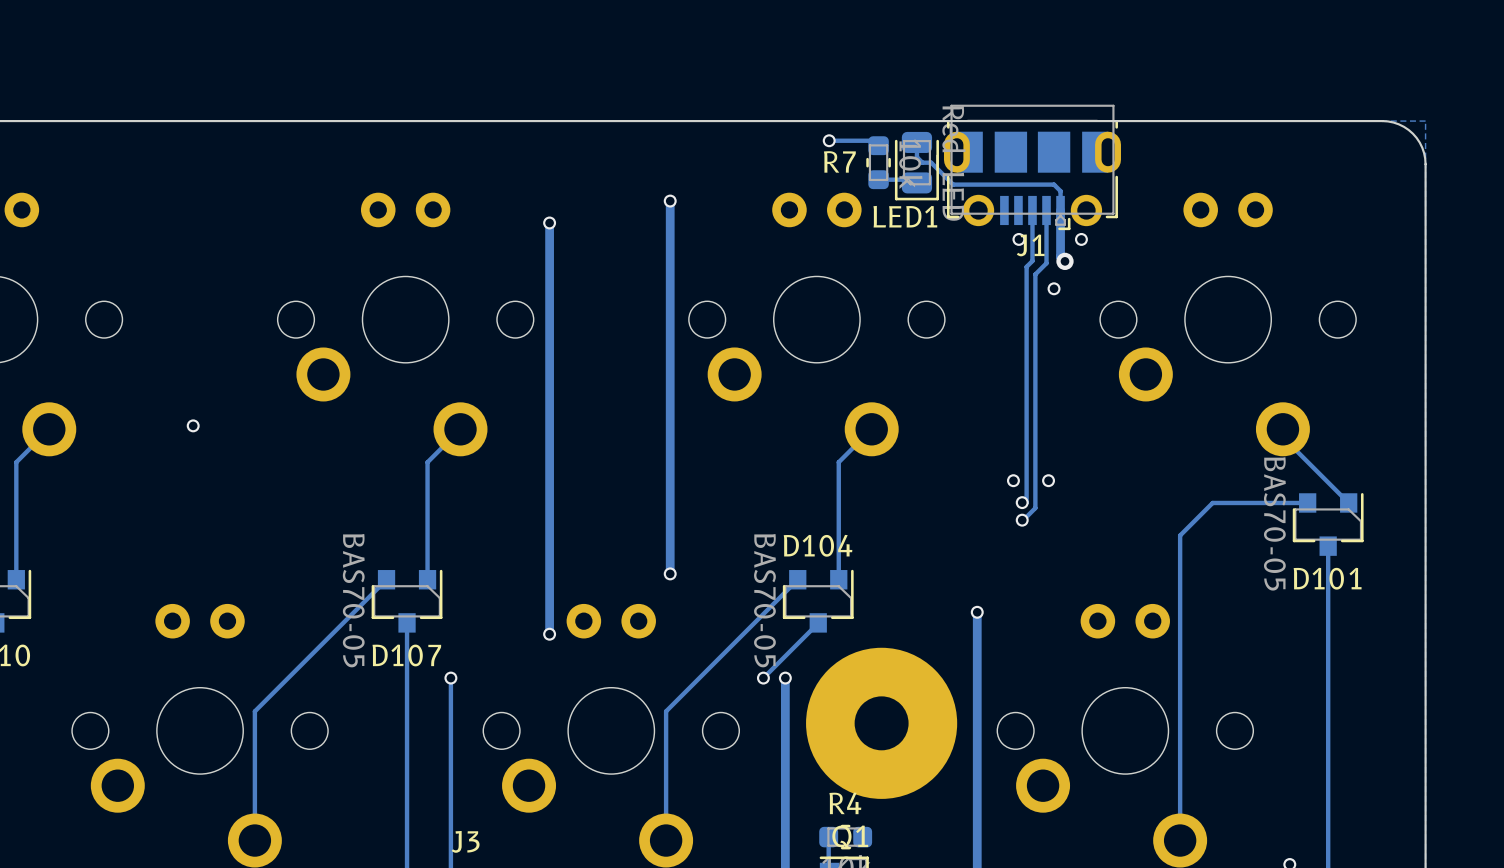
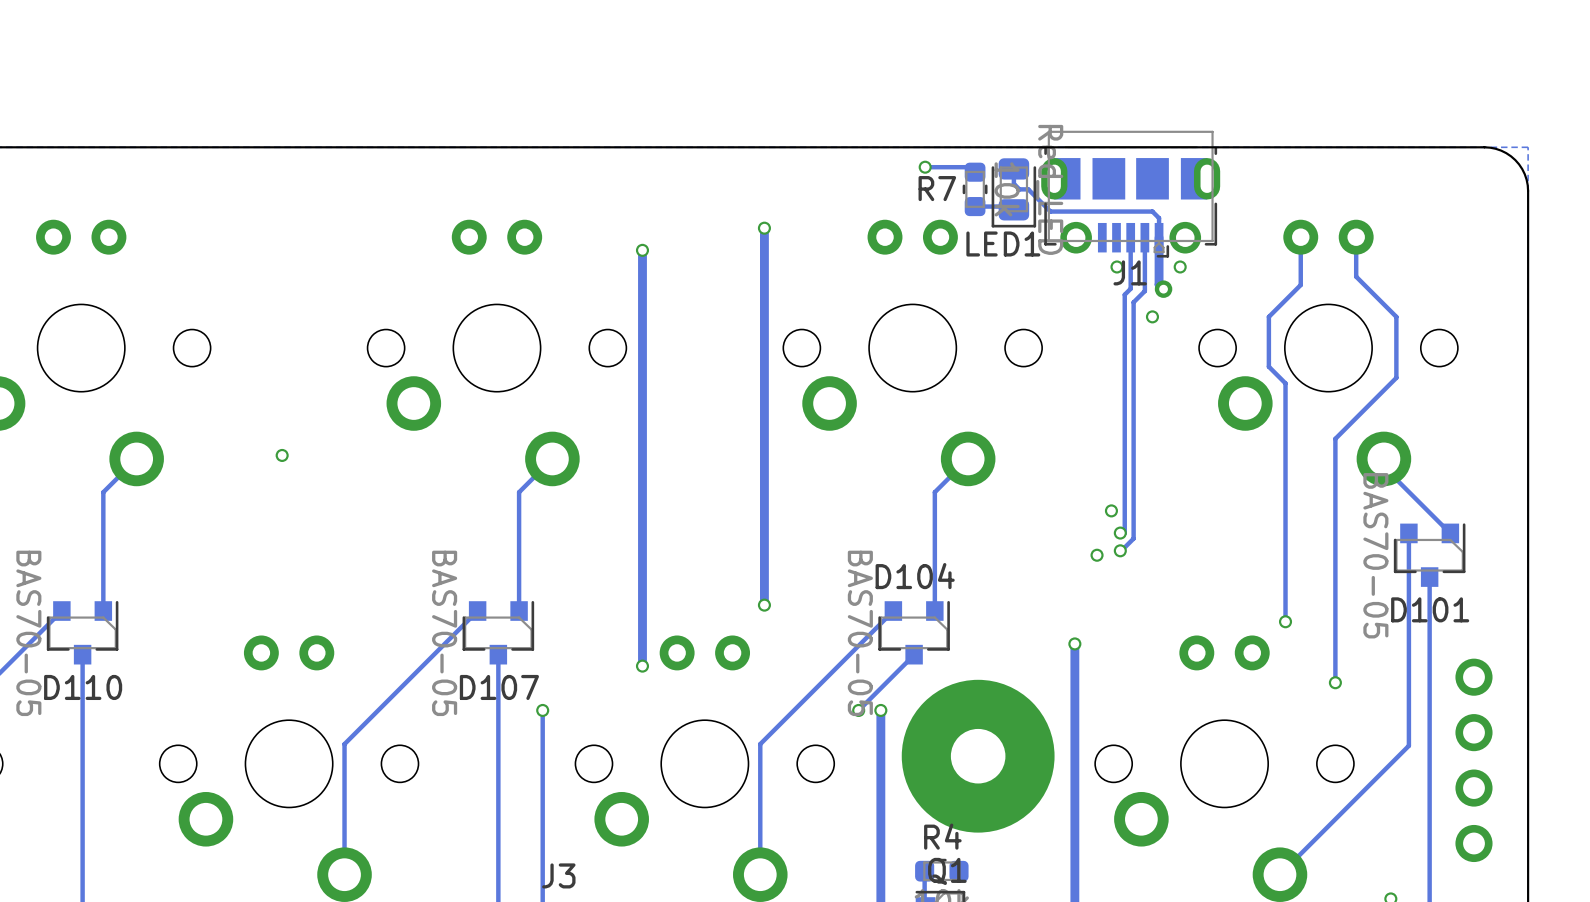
track: none -> (1300, 237) (1300, 285) (1268, 316) (1268, 366) (1285, 383) (1285, 621)
track: none -> (1356, 237) (1356, 276) (1396, 316) (1396, 377) (1335, 438) (1335, 682)
via position: (1048, 480) -> (1097, 555)
track: (1307, 502) (1212, 502) (1180, 535) (1180, 840) -> (1408, 533) (1408, 745) (1279, 874)
via: none -> (1285, 621)
via: none -> (1335, 682)
part: none -> (1473, 760)

